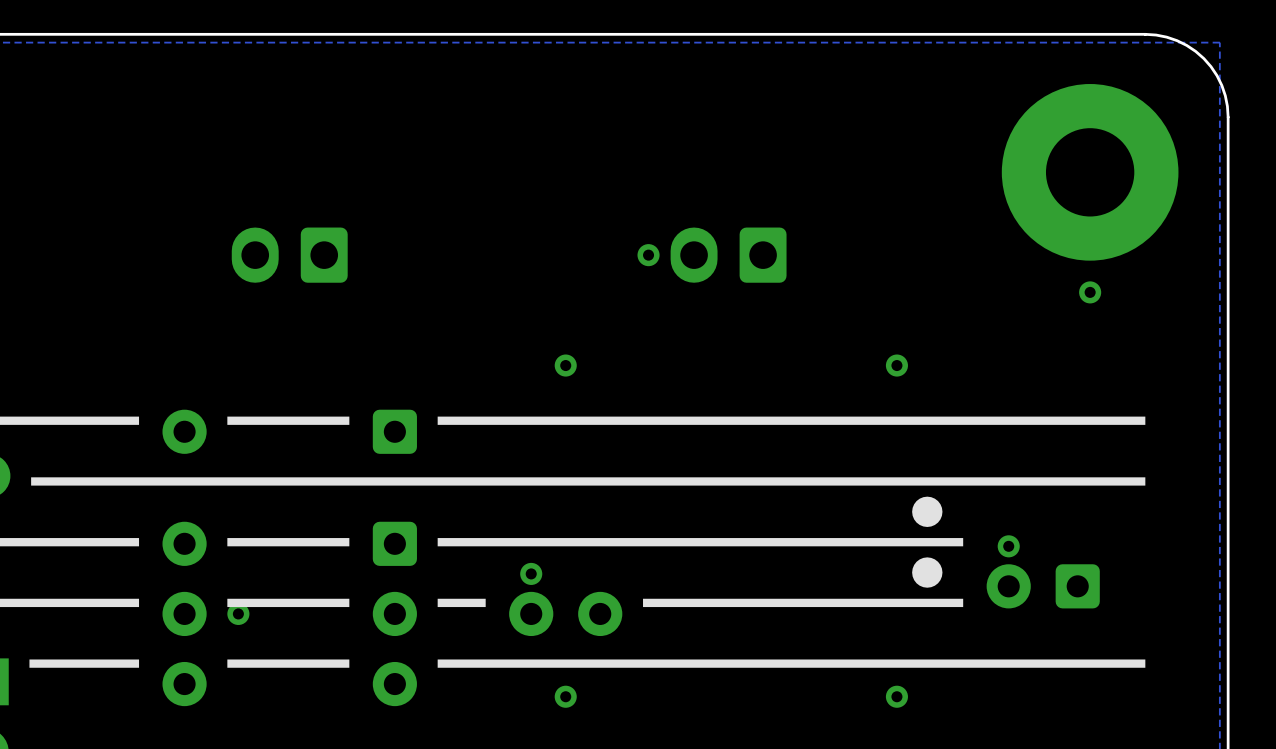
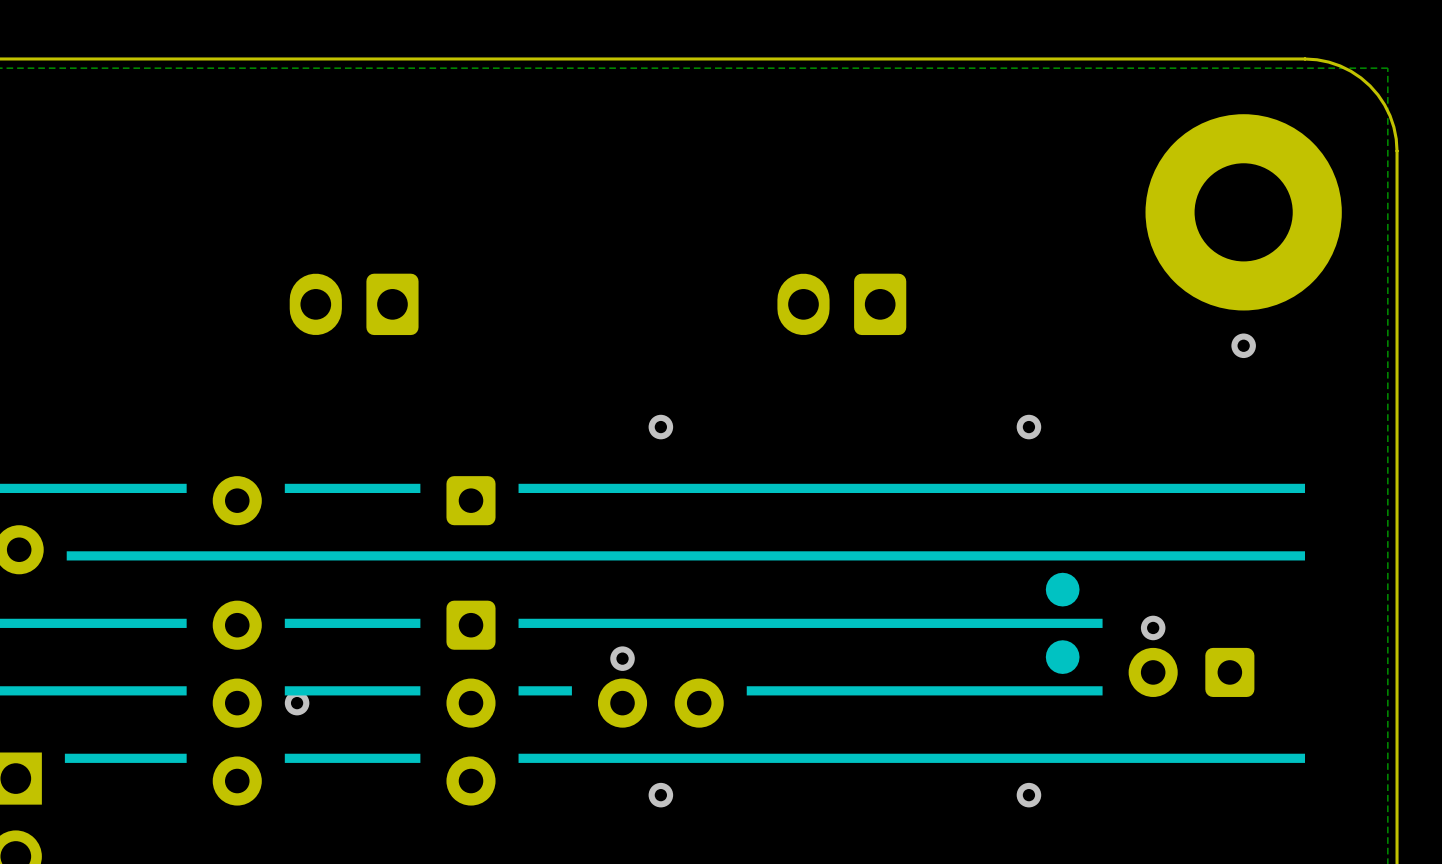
via: (648, 255) -> none

